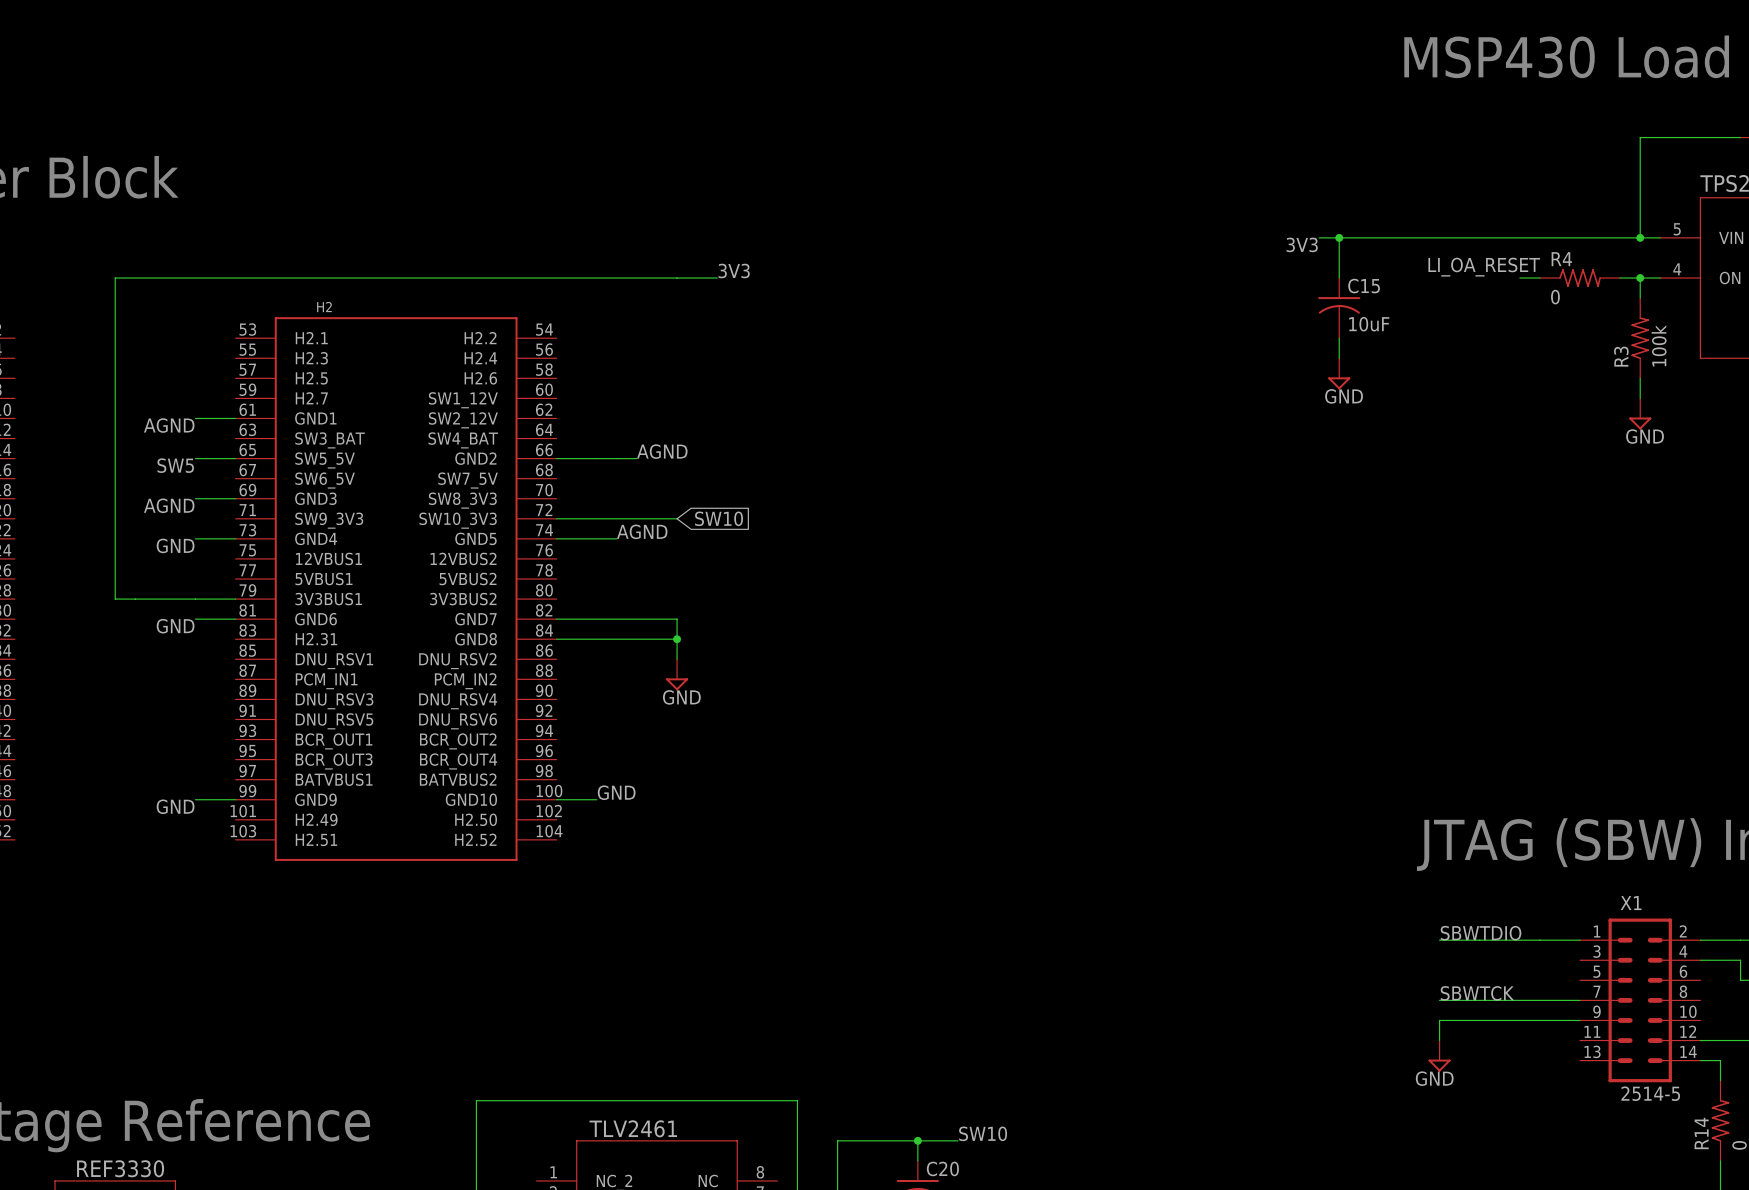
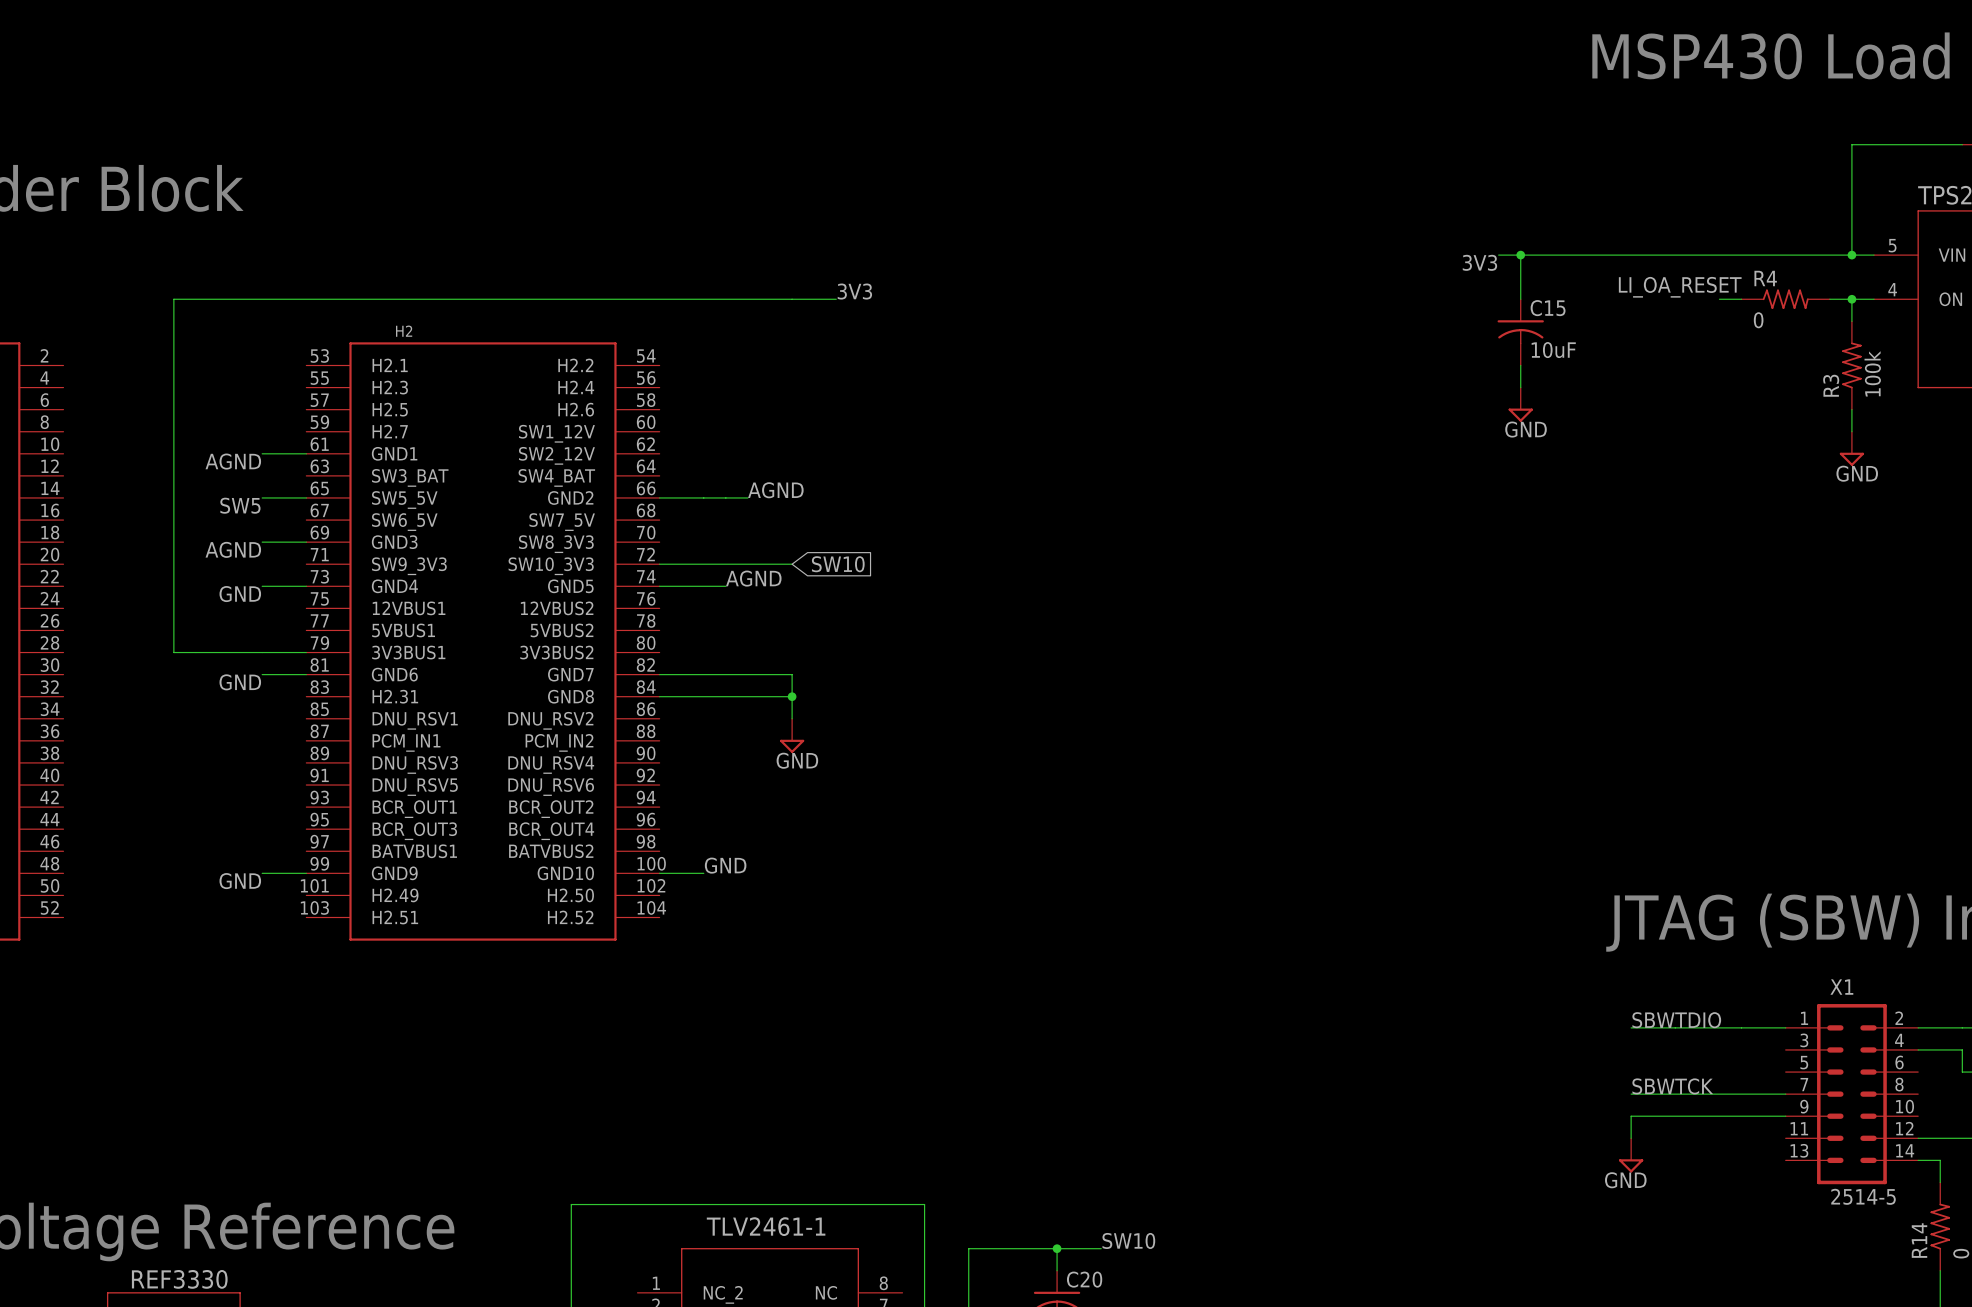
TLV2461 name: TLV2461 (633, 1128) -> TLV2461-1 (766, 1226)

